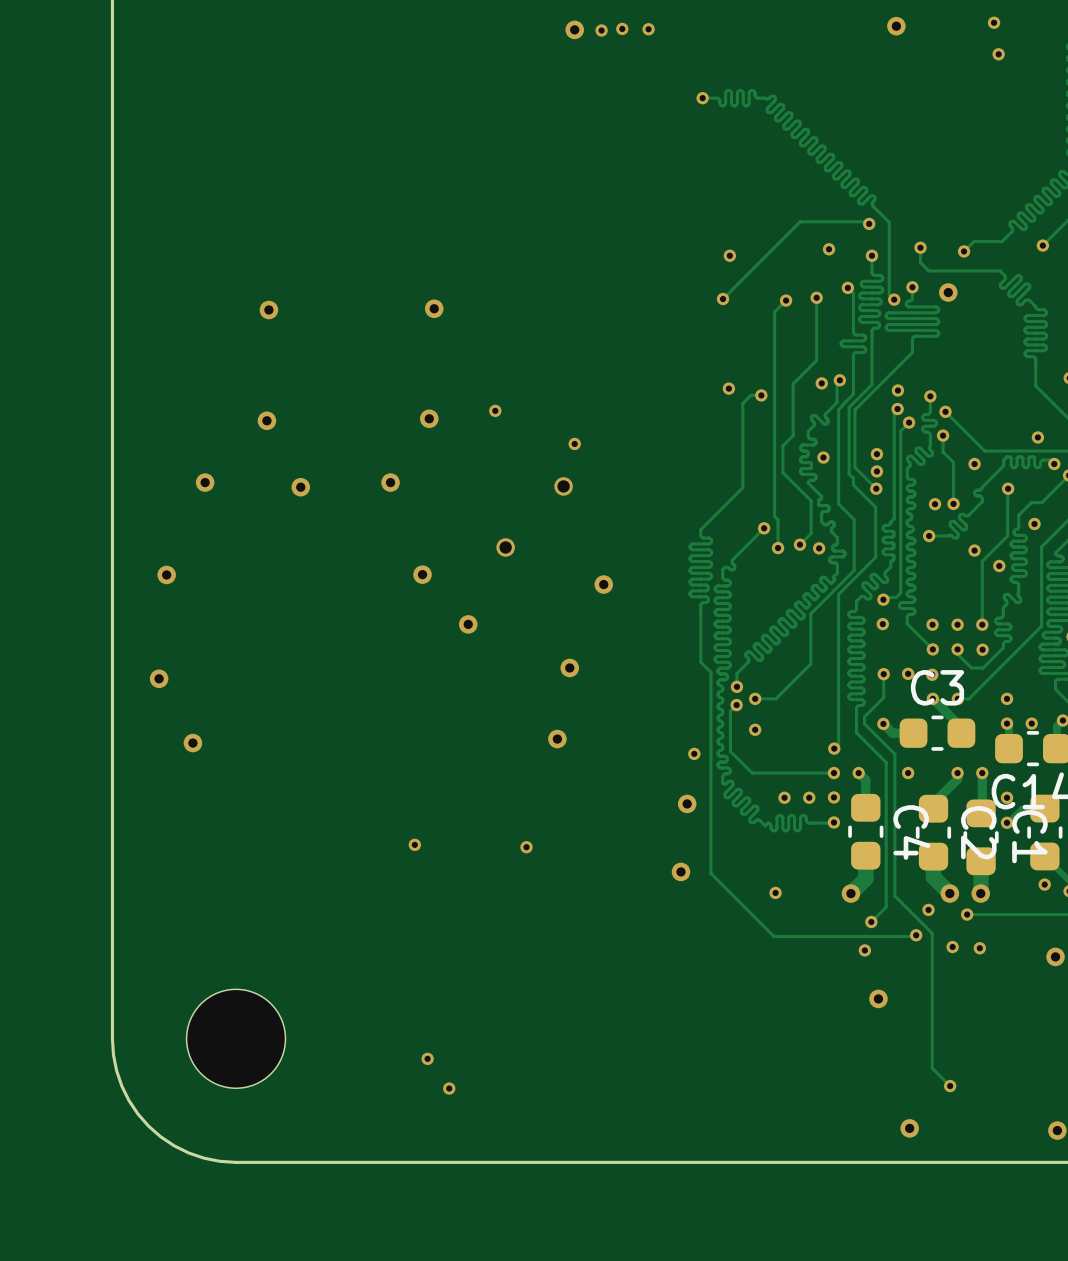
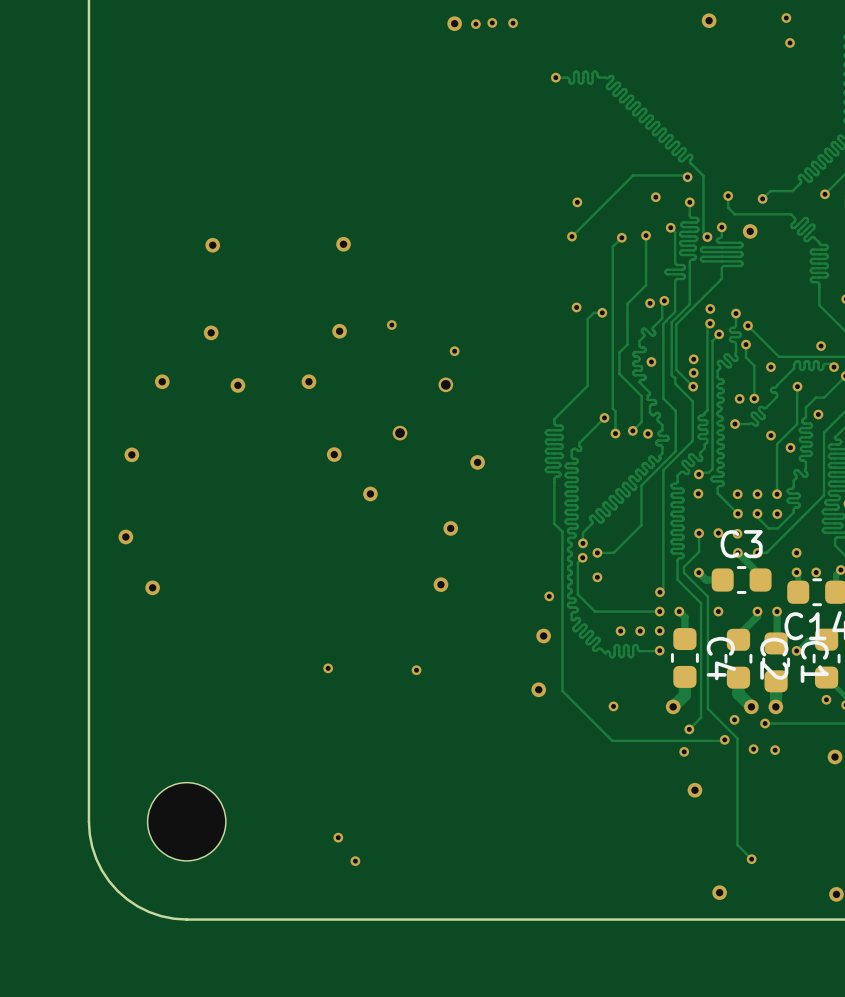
via: (1007, 797) -> none

